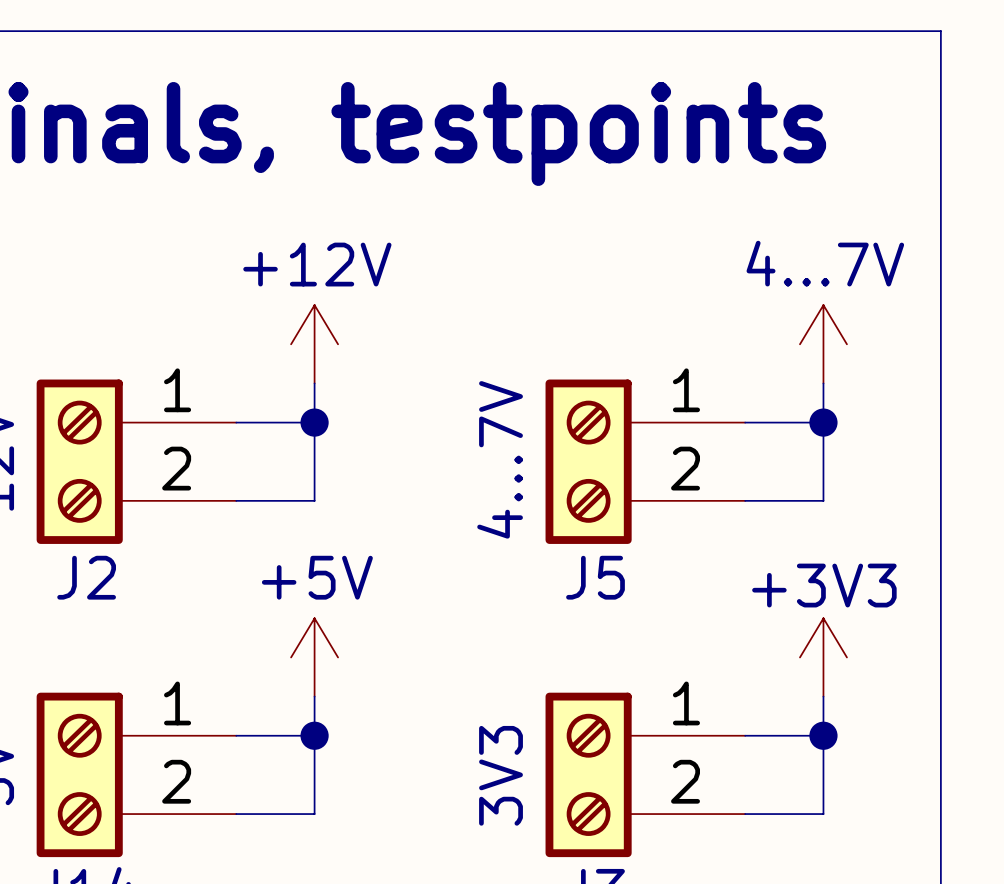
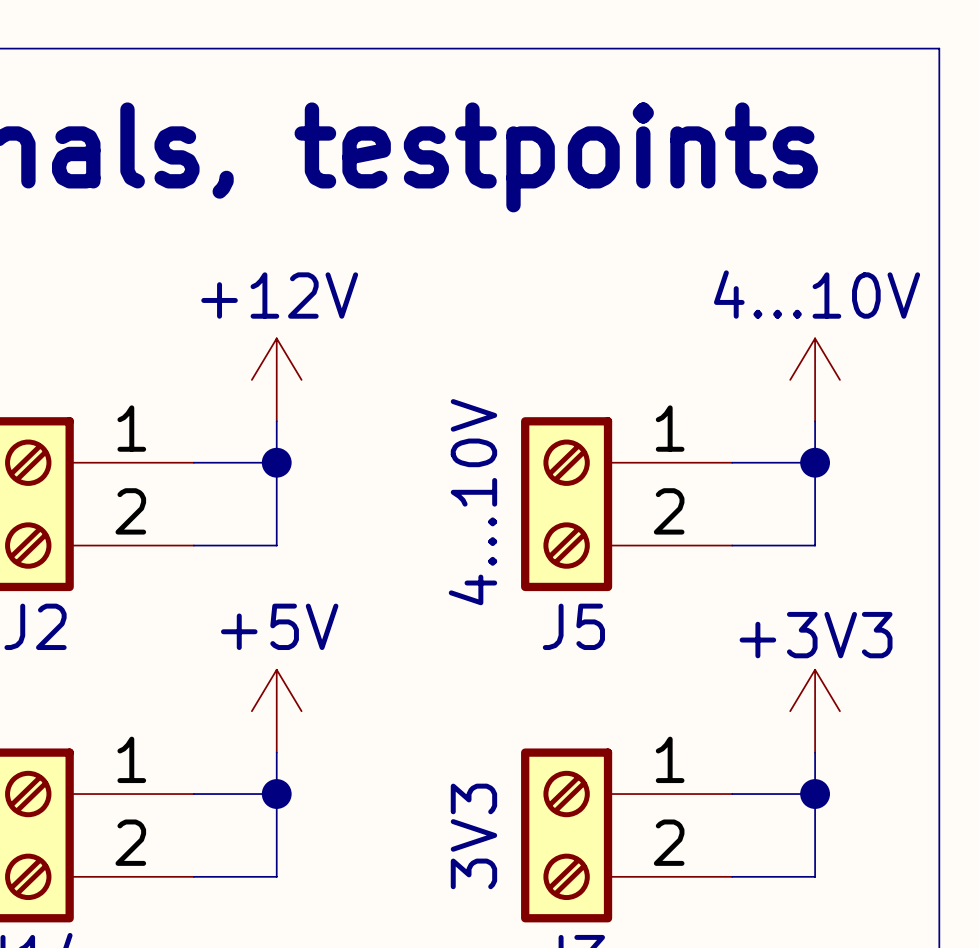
power symbol: 4...7V (823, 344) -> 4...10V (815, 379)
J5 value: 4...7V (500, 459) -> 4...10V (472, 502)

